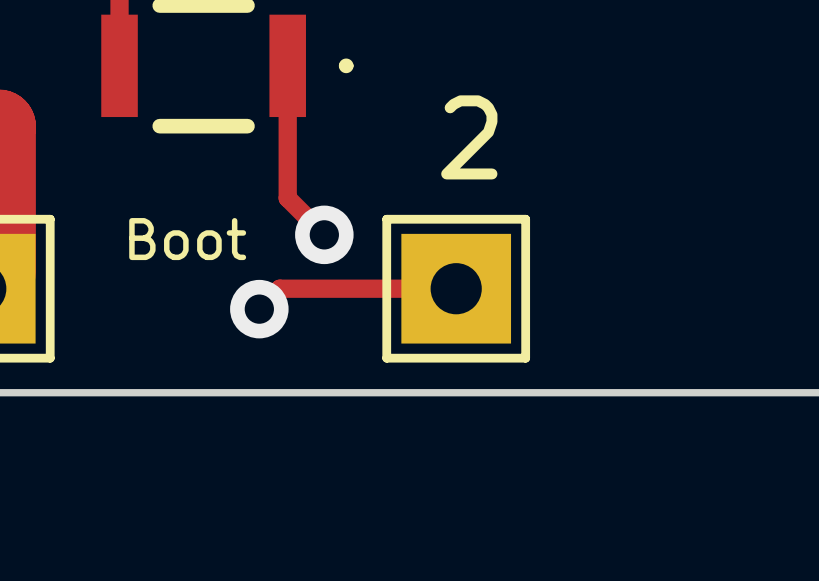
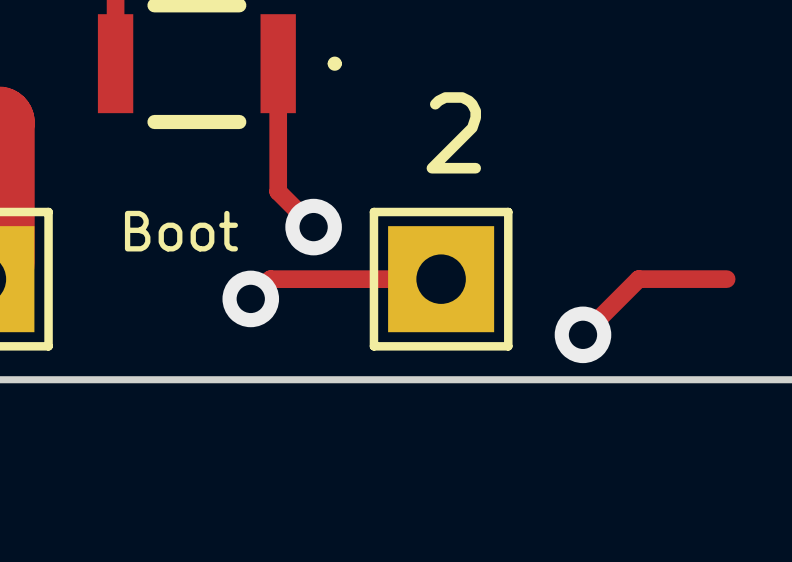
track: none -> (726, 279) (638, 279) (582, 334)
via: none -> (582, 334)

